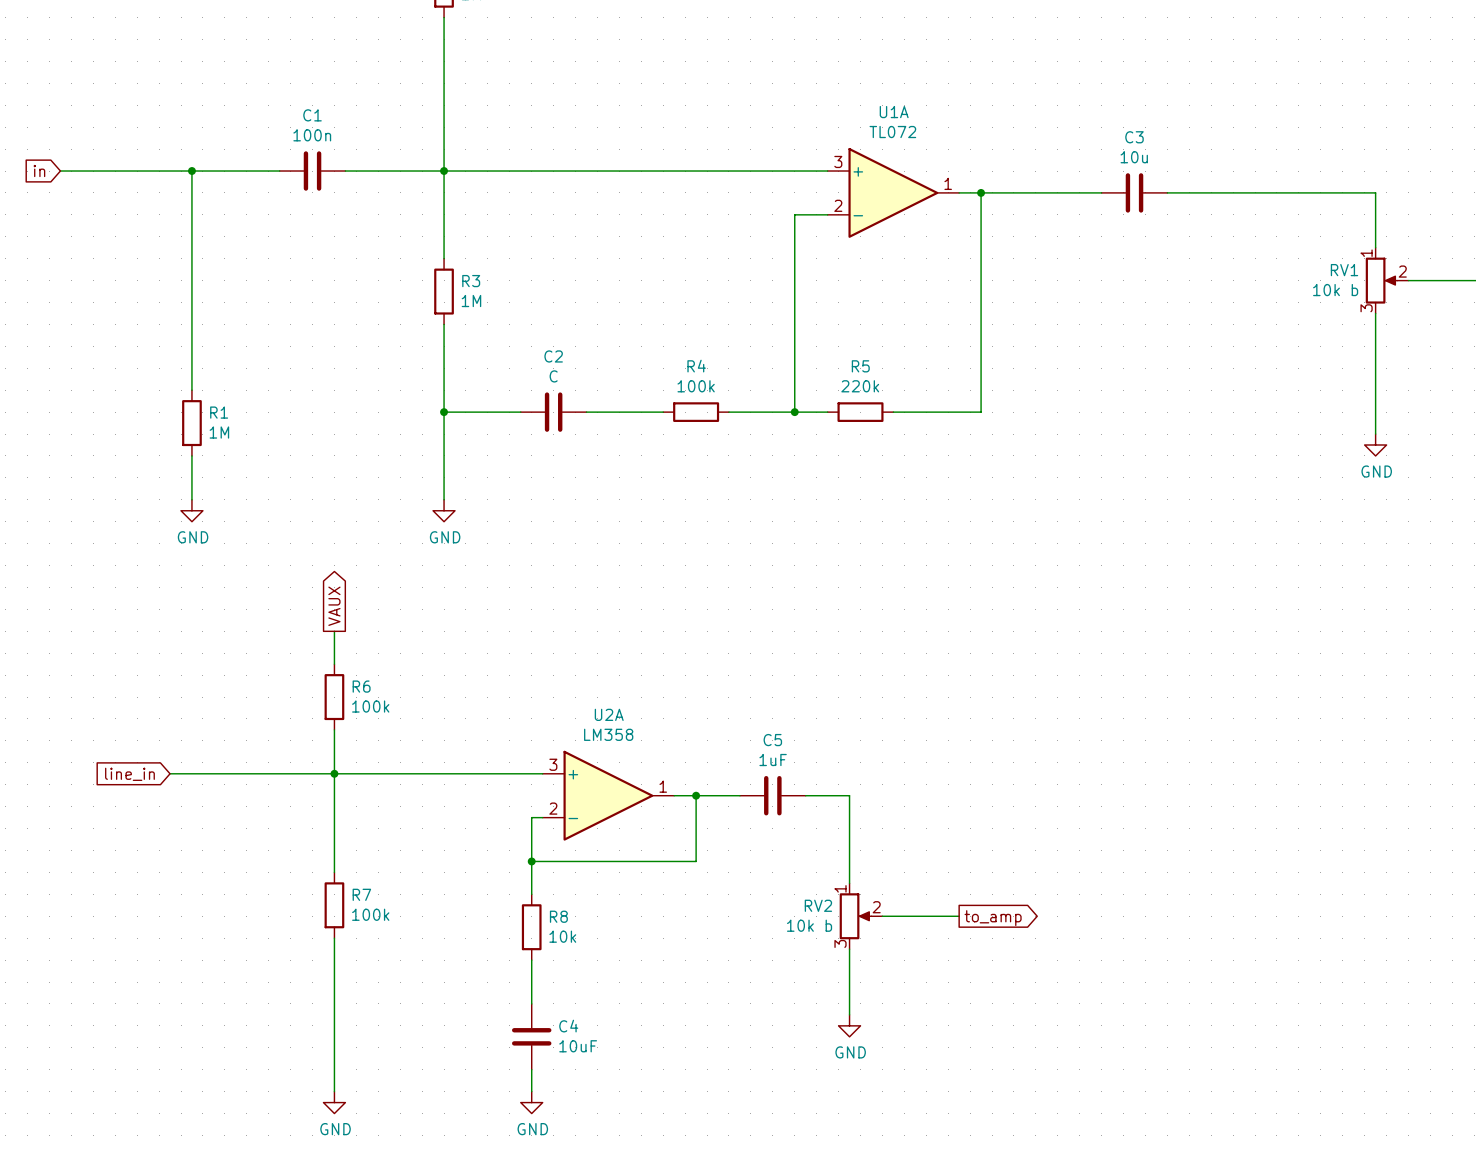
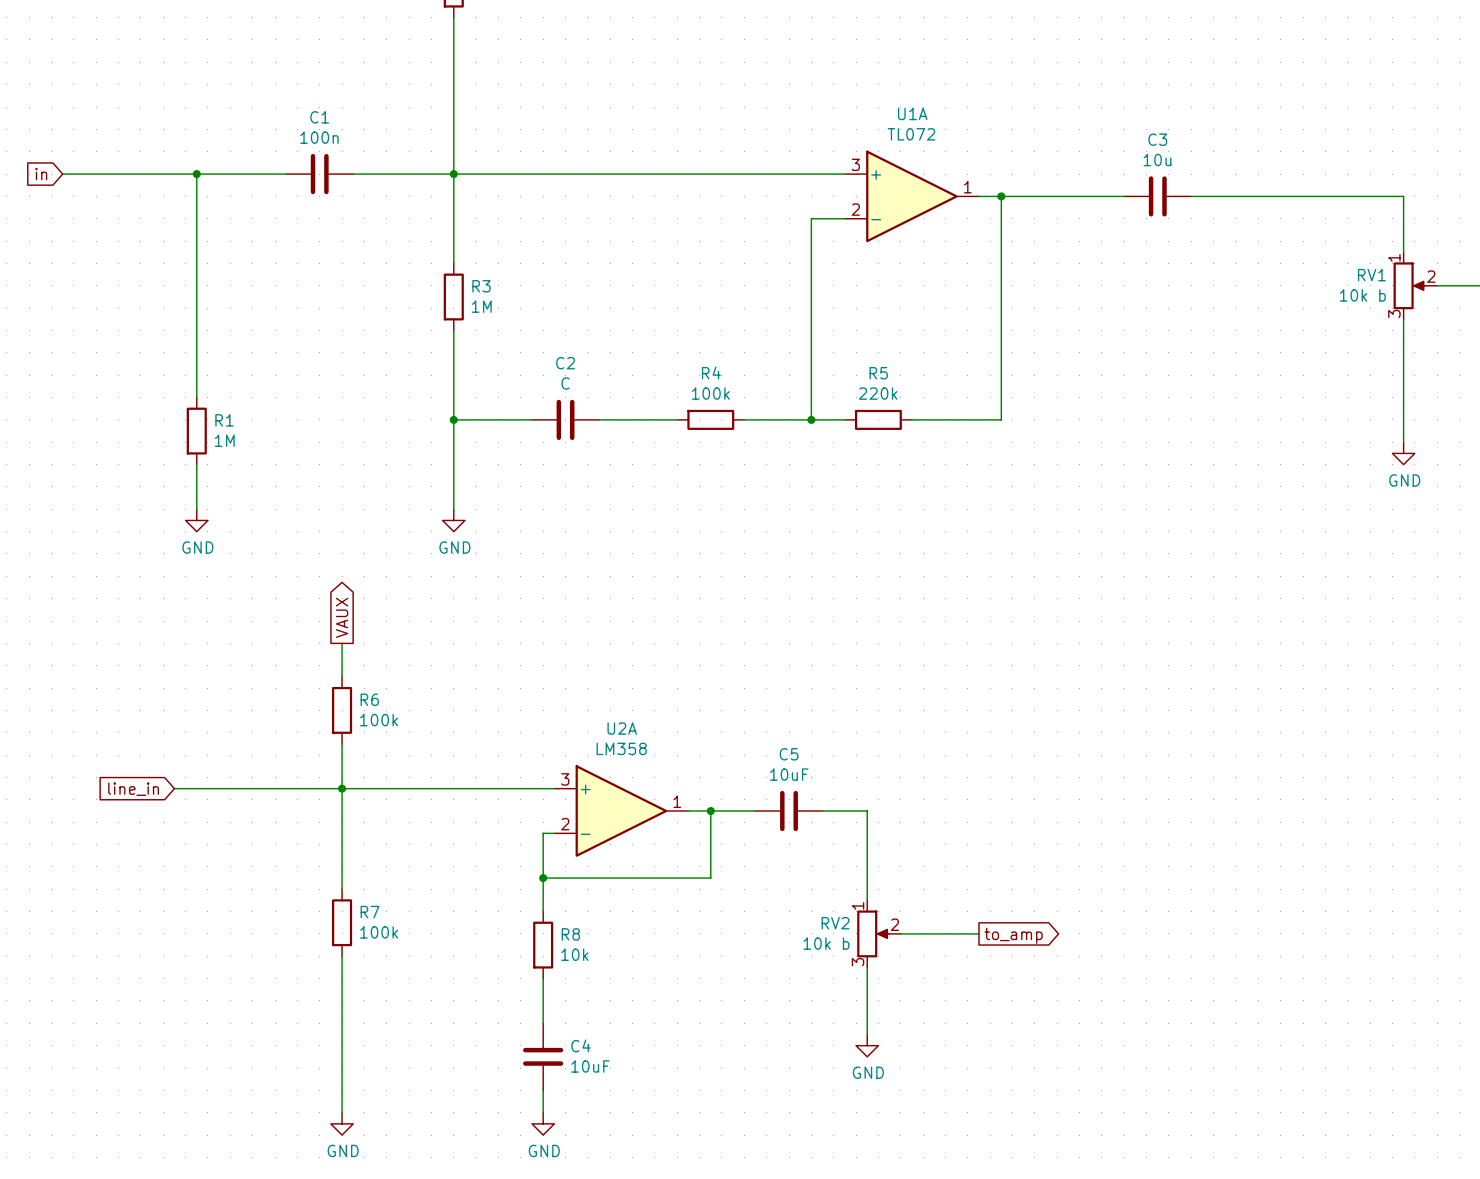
C5 value: 1uF (773, 760) -> 10uF (789, 774)

